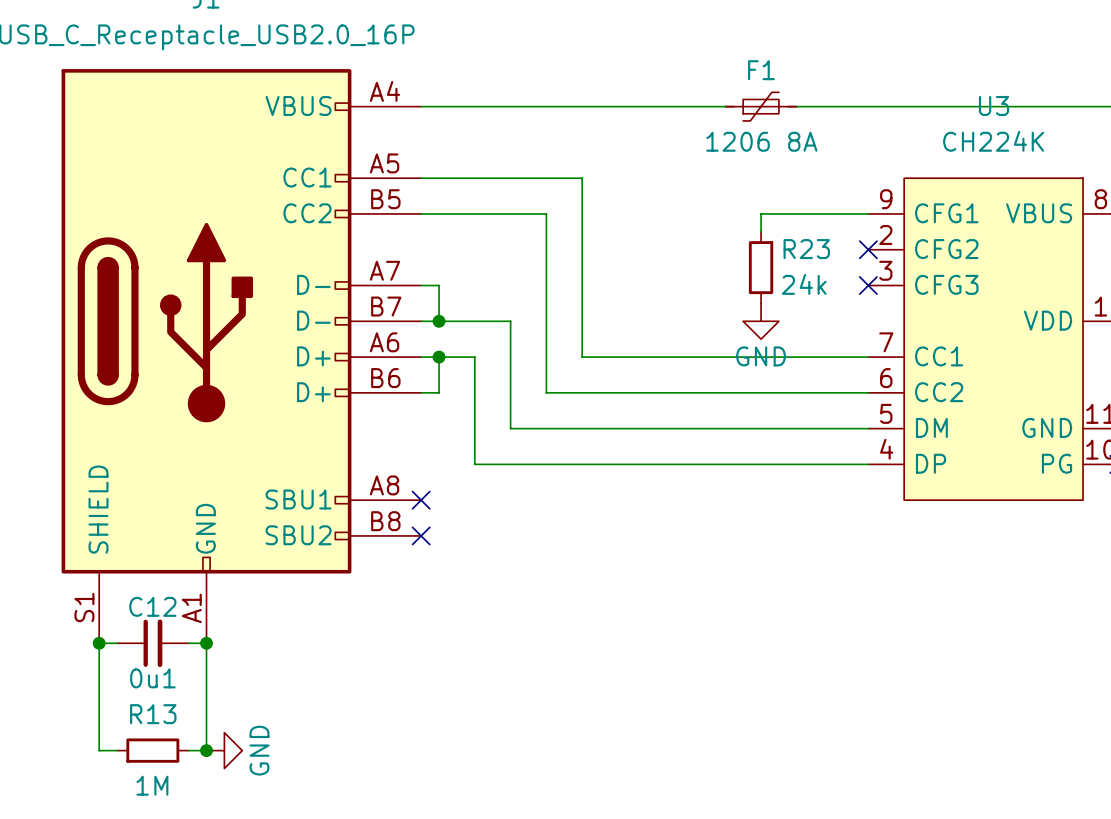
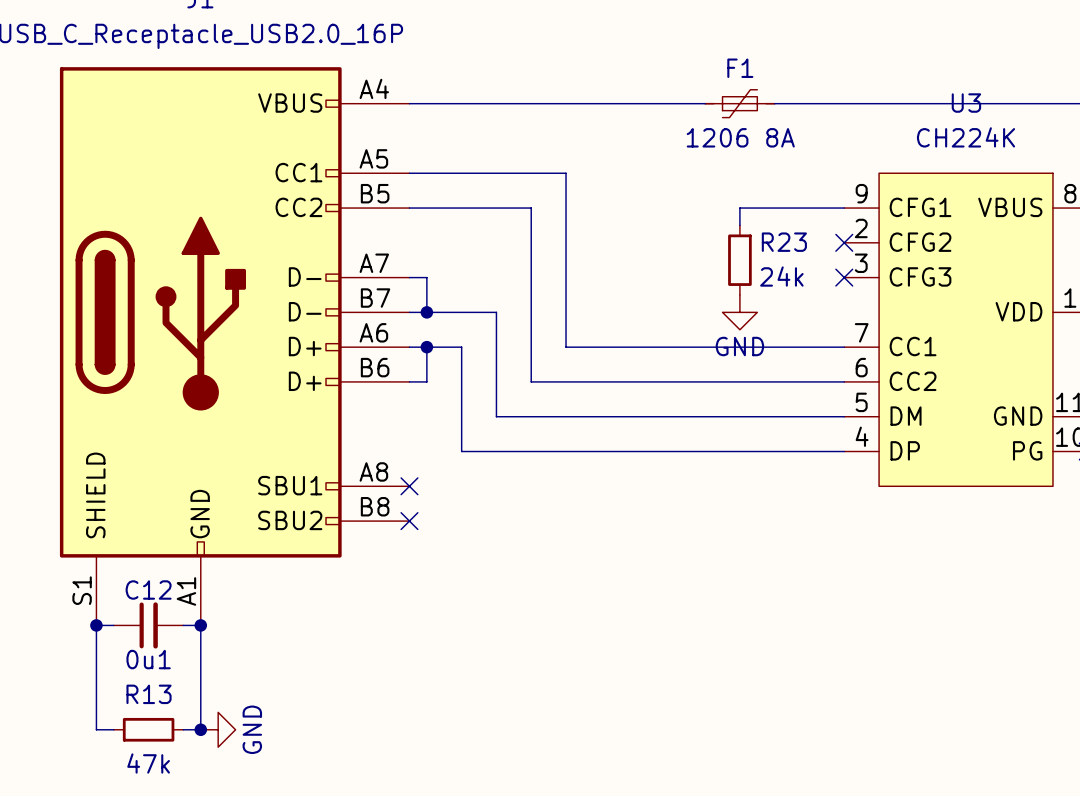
R13 value: 1M (152, 785) -> 47k (148, 763)

